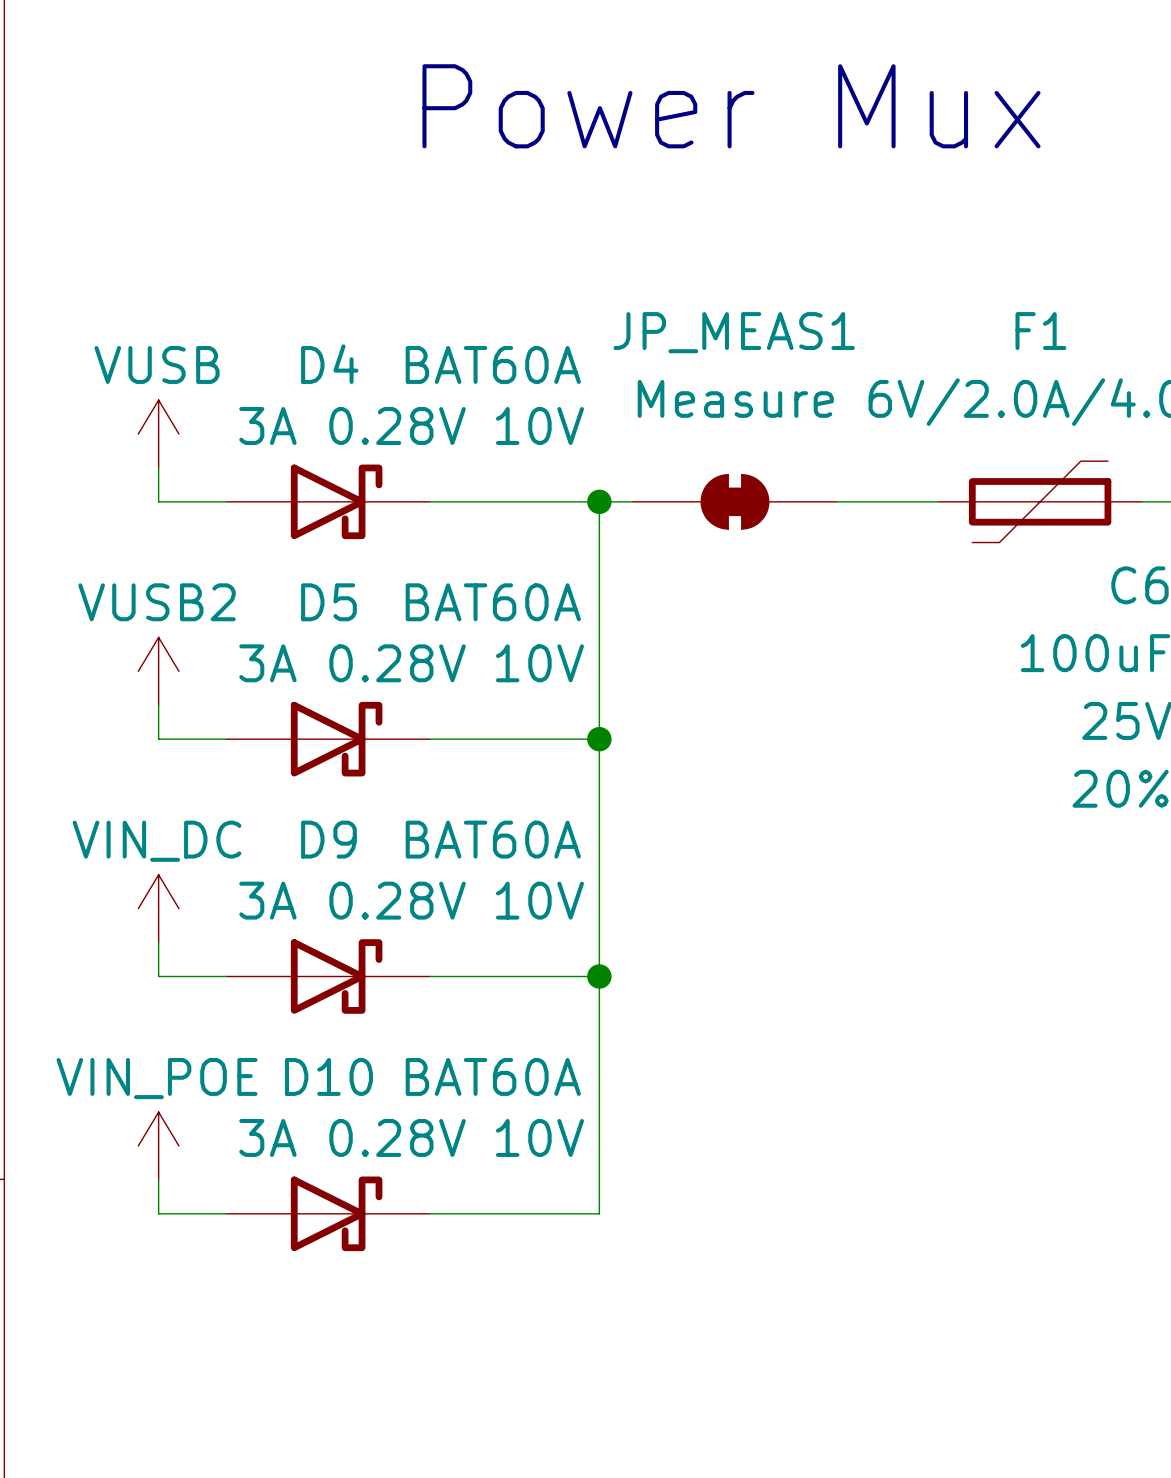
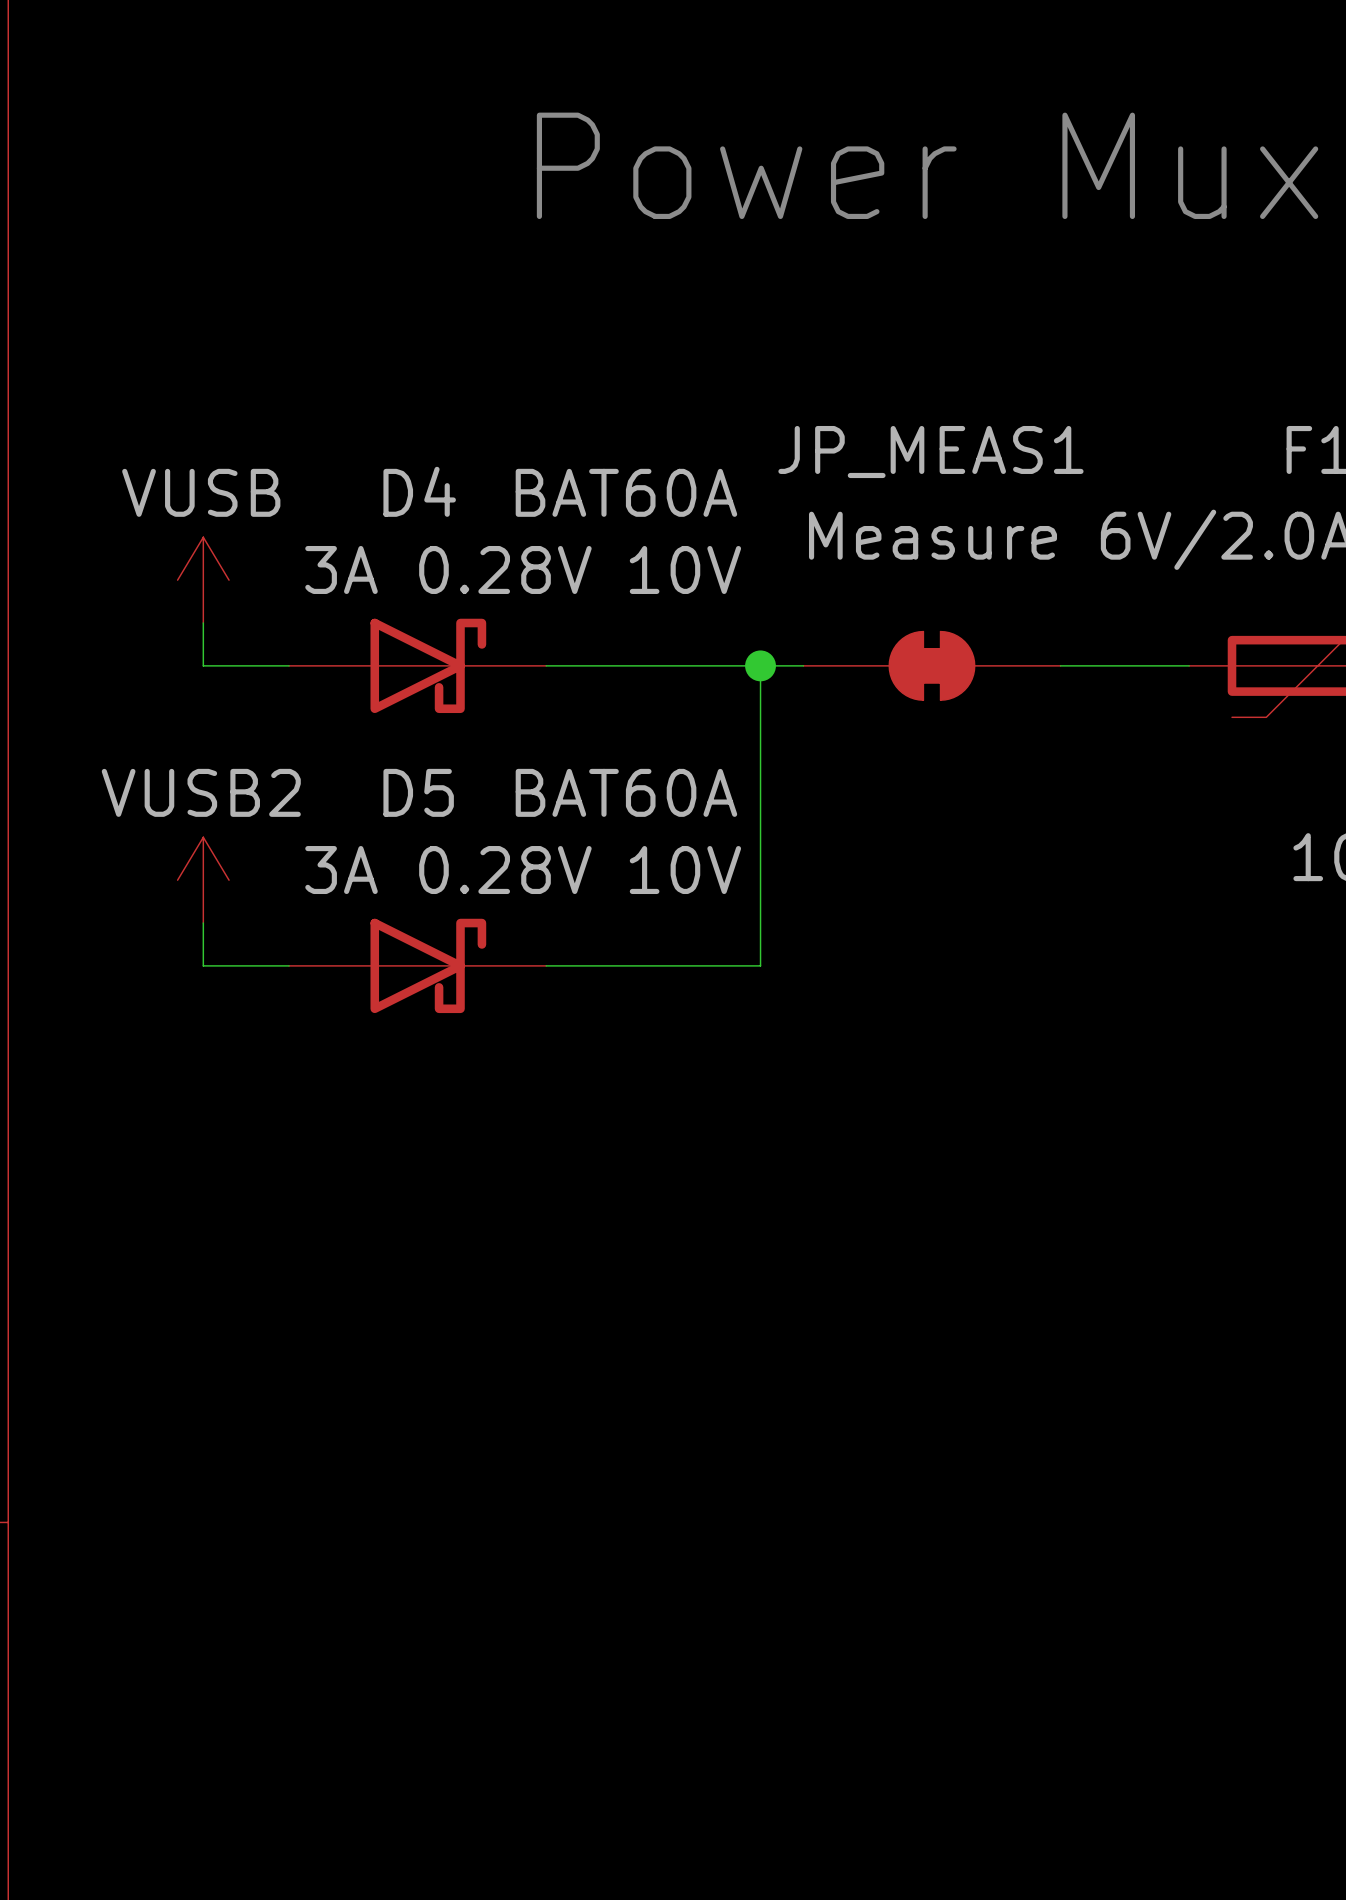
wire: (599, 739) (599, 1213) (429, 1213) -> none
junction: (599, 739) -> none
power symbol: VIN_DC (158, 908) -> none
wire: (158, 942) (158, 976) (226, 976) -> none
D9: BAT60A (328, 976) -> none
wire: (429, 976) (599, 976) -> none
junction: (599, 976) -> none
power symbol: VIN_POE (158, 1146) -> none
wire: (158, 1179) (158, 1213) (226, 1213) -> none
D10: BAT60A (328, 1213) -> none

